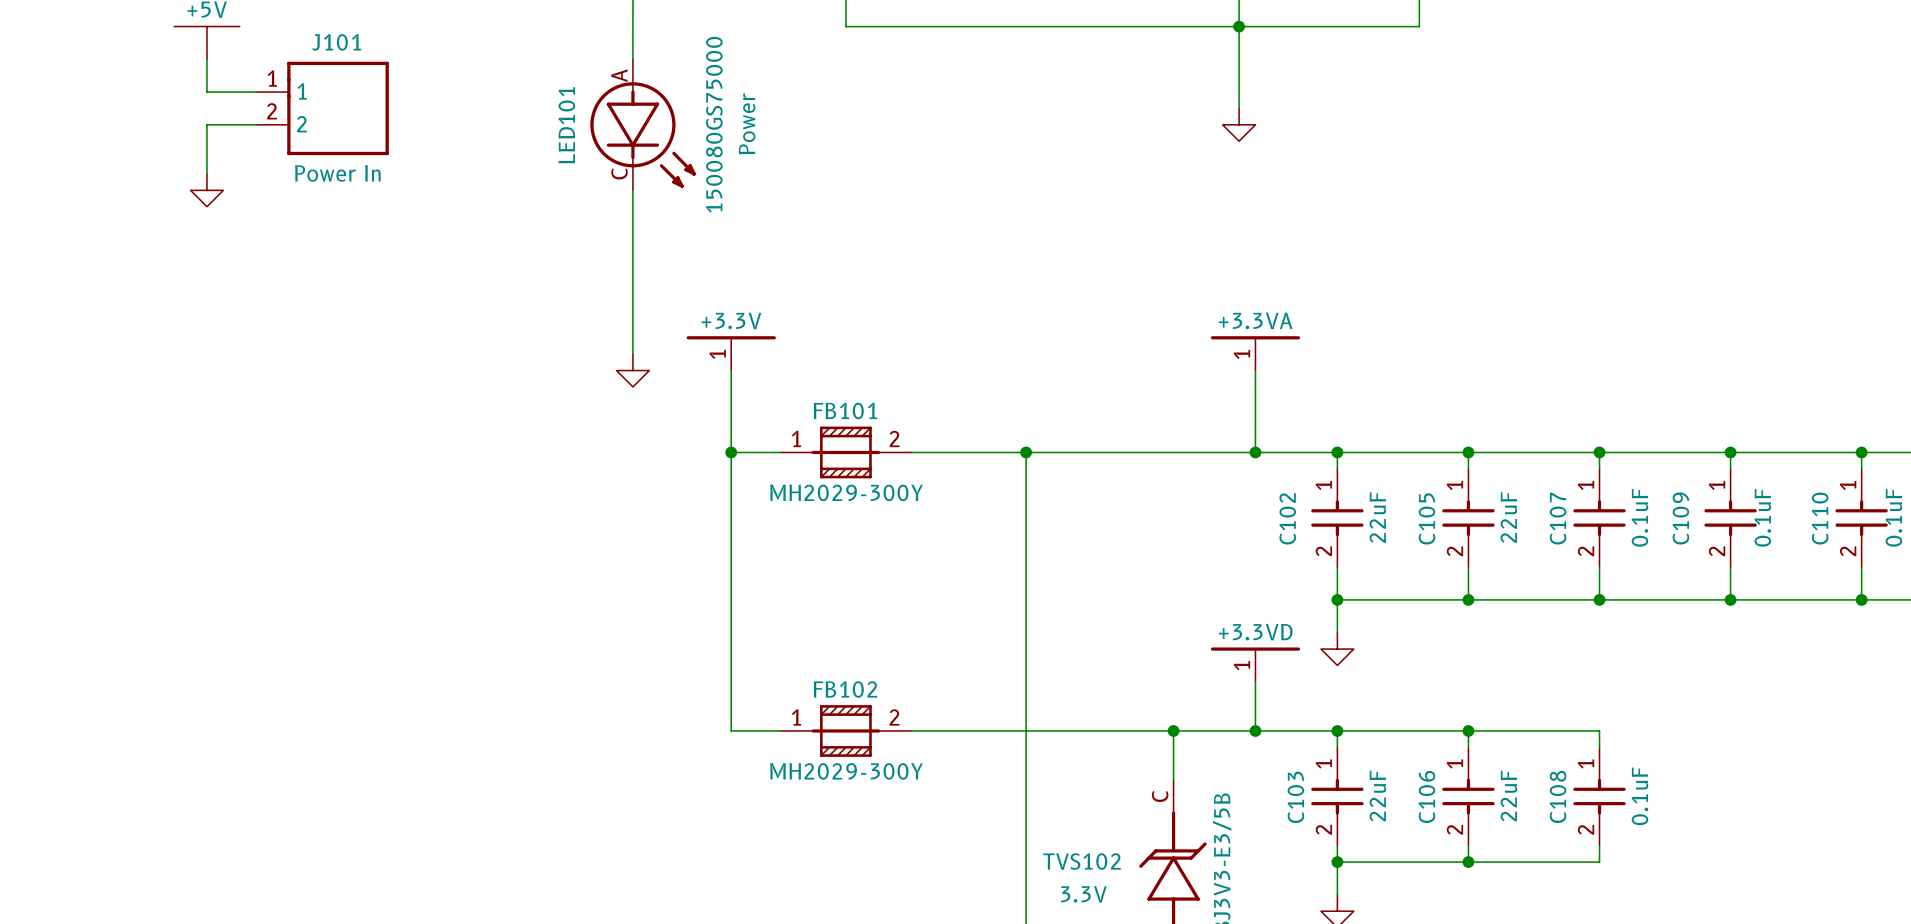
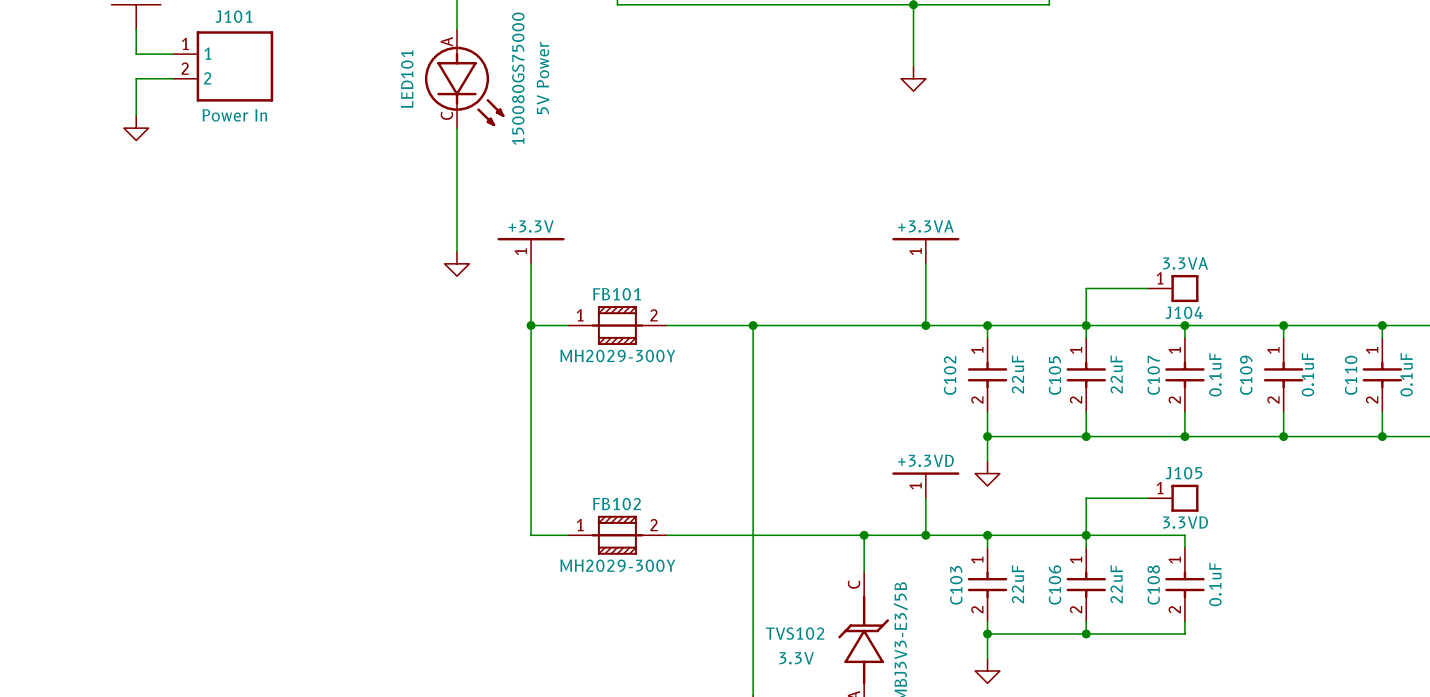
LED101 value: Power (747, 123) -> 5V Power (542, 77)
wire: none -> (1147, 288) (1086, 288) (1086, 325)
J104: none -> 3.3VA (1173, 288)
wire: none -> (1147, 498) (1086, 498) (1086, 535)
J105: none -> 3.3VD (1173, 498)

